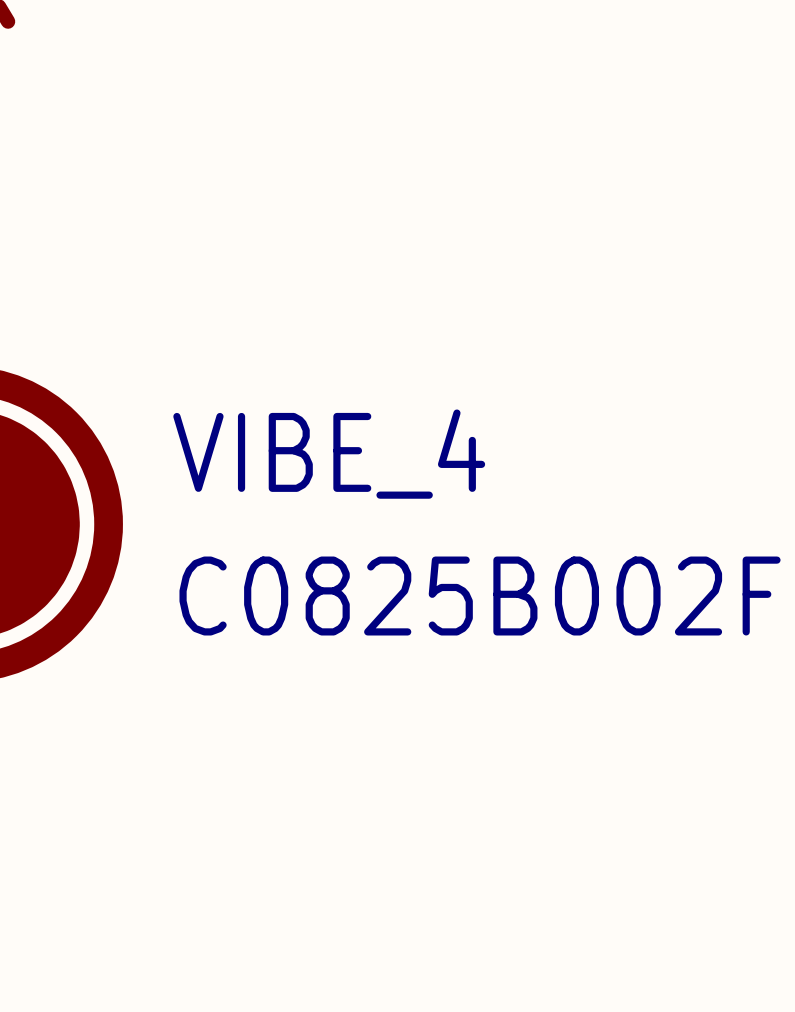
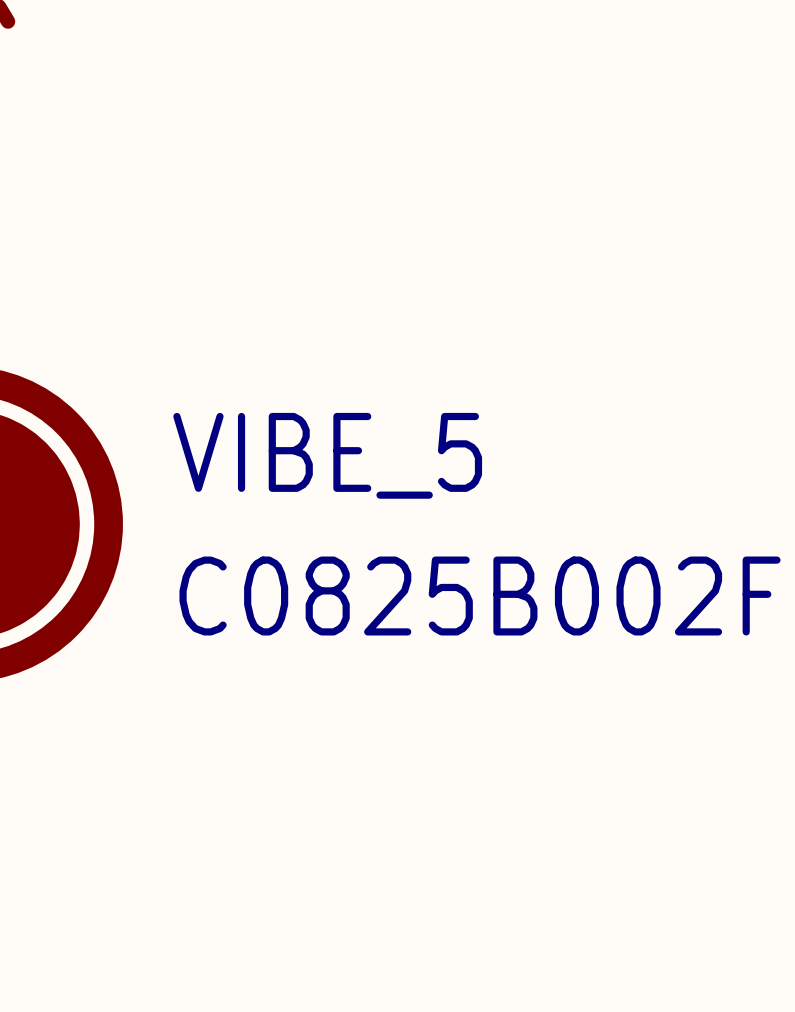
VIBE_4 name: VIBE_4 (329, 454) -> VIBE_5 (327, 455)

